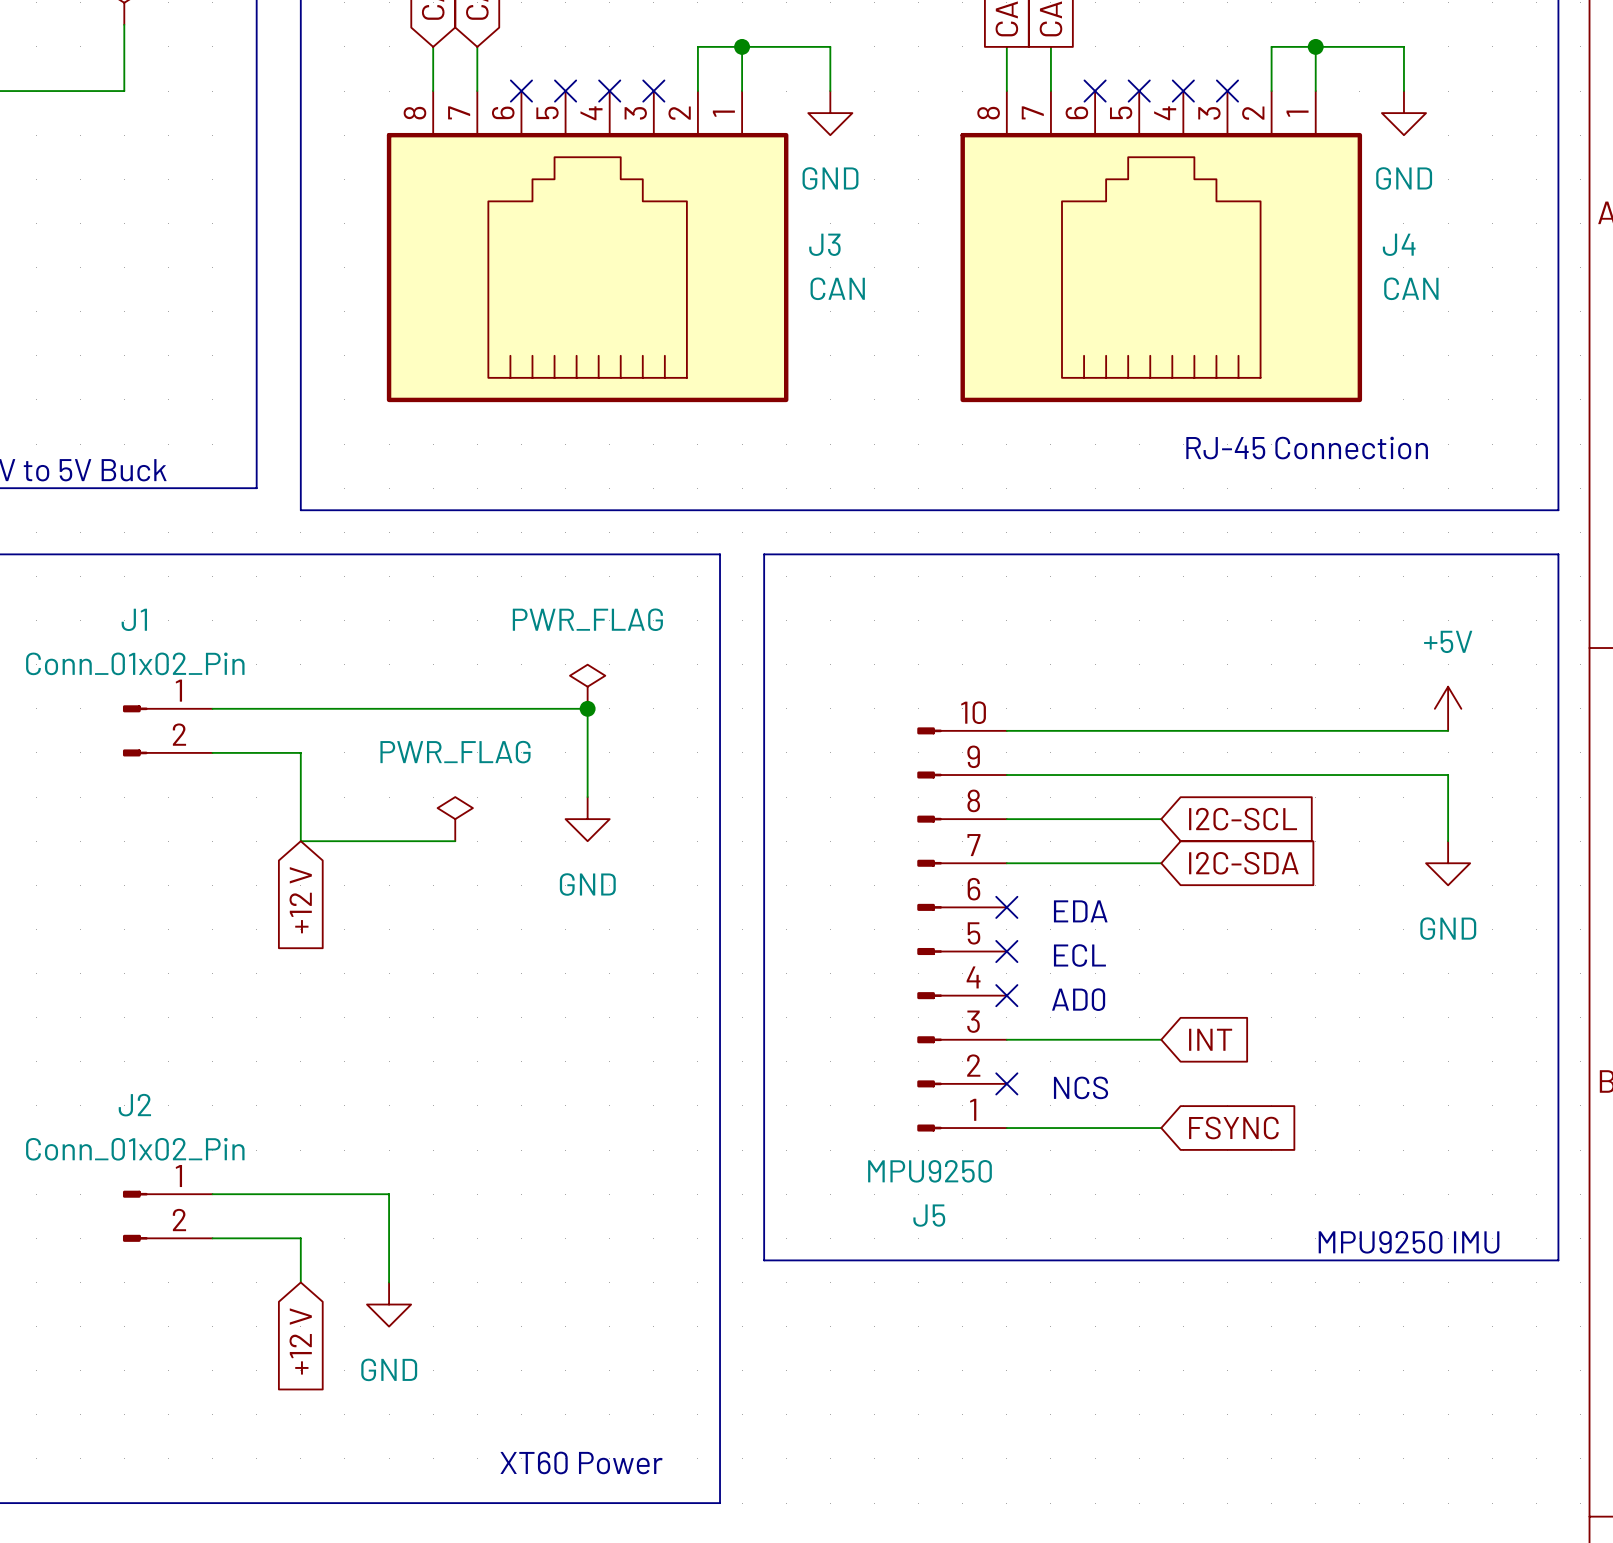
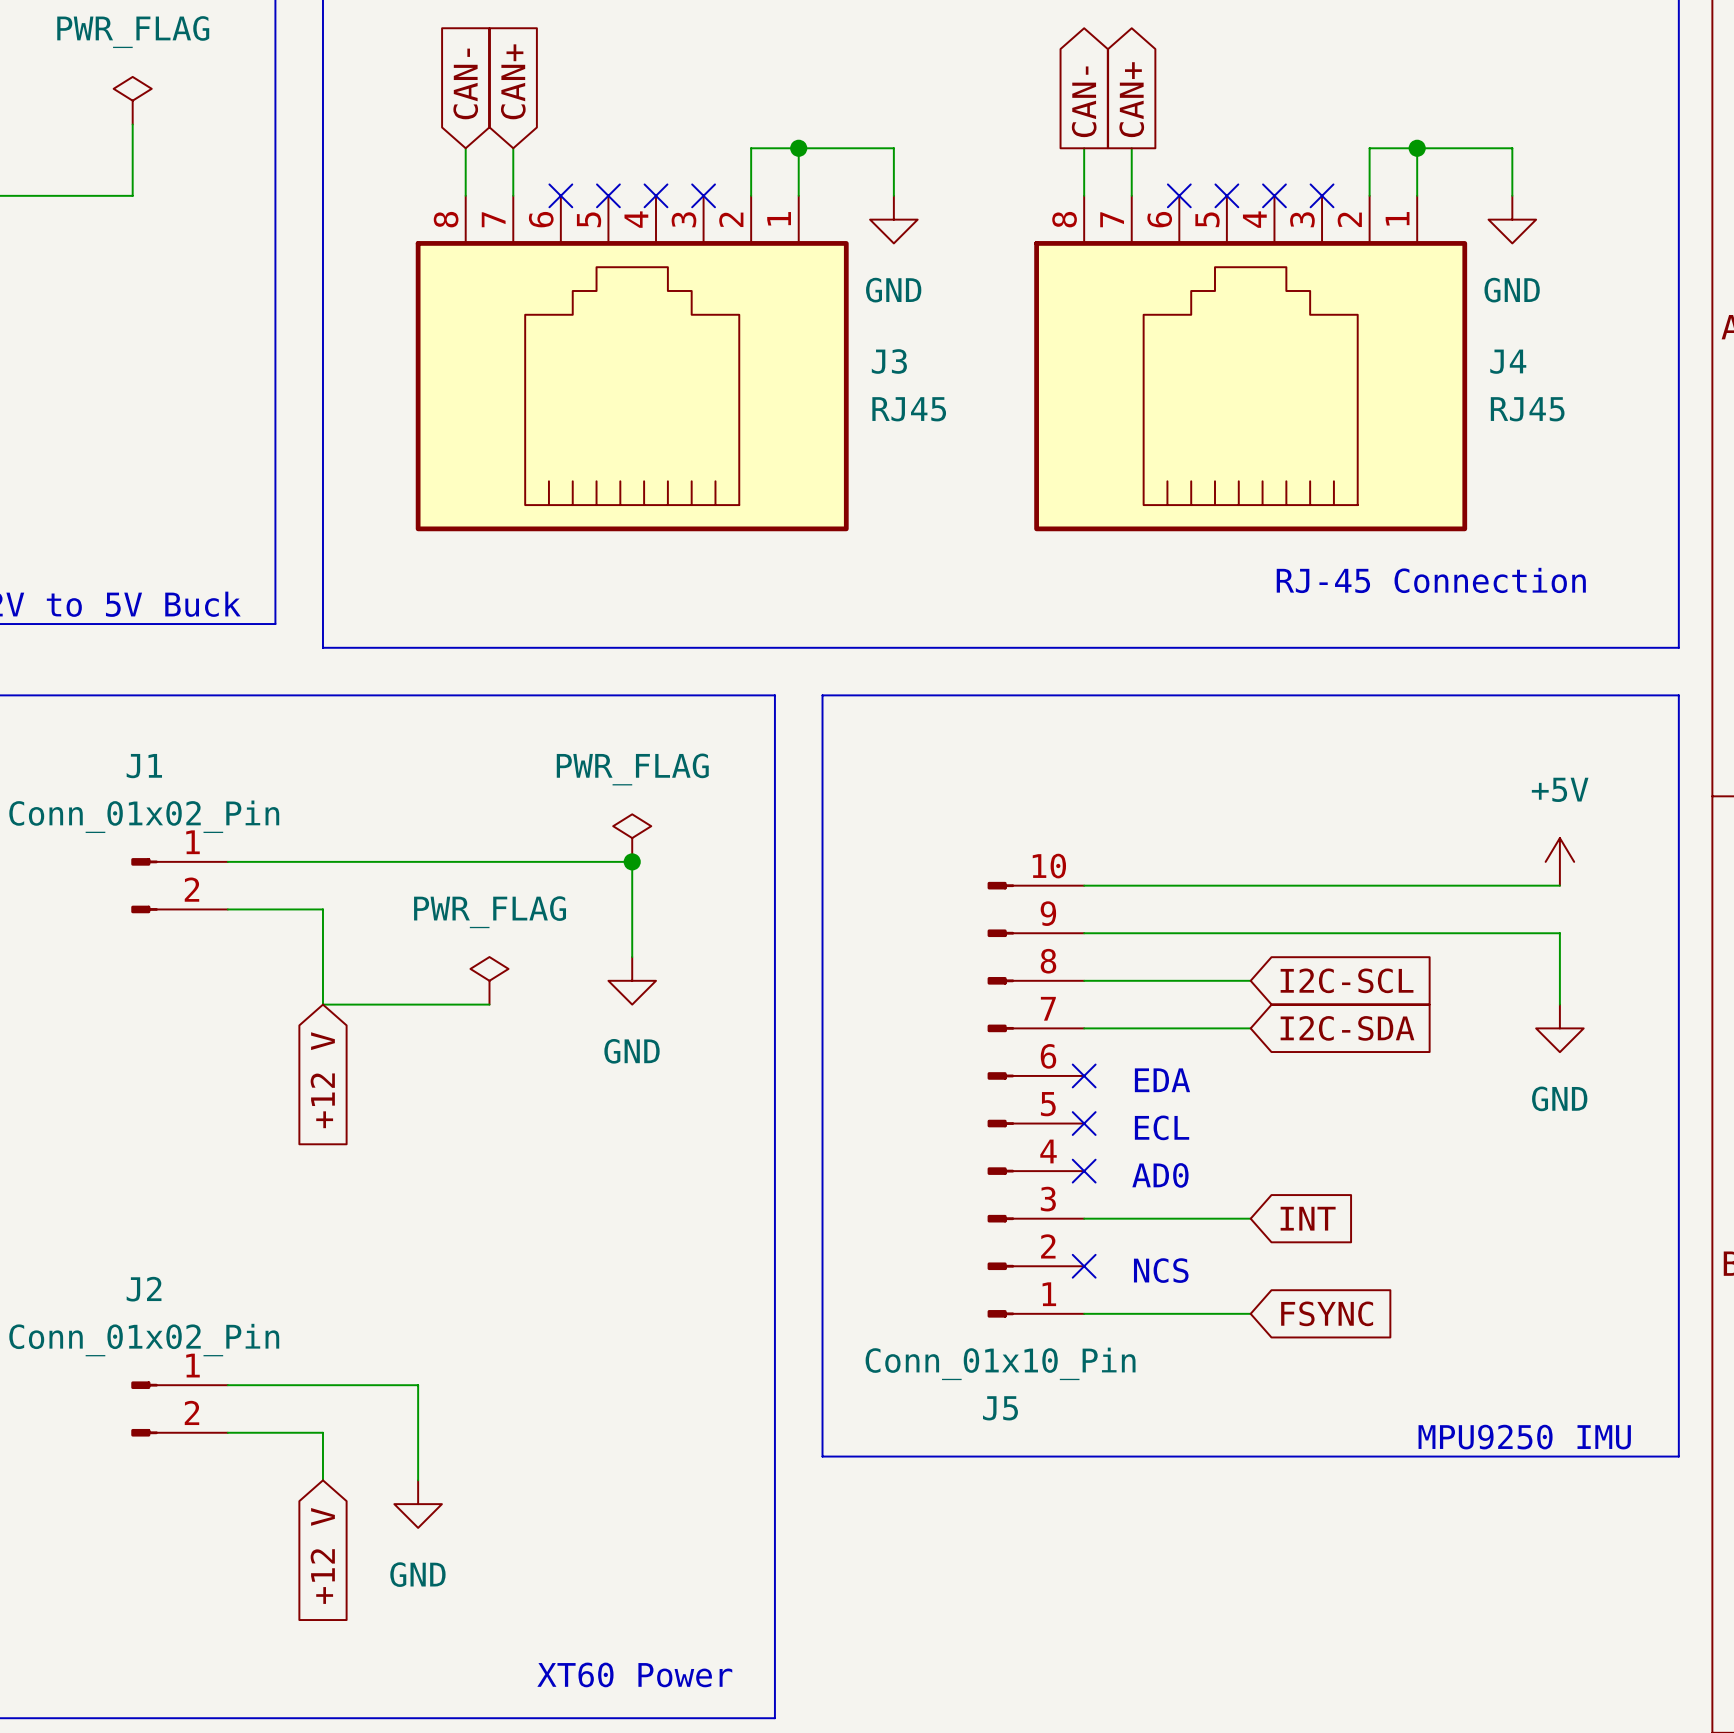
J3 value: CAN (837, 288) -> RJ45 (909, 409)
J4 value: CAN (1411, 288) -> RJ45 (1527, 409)
J5 value: MPU9250 (929, 1171) -> Conn_01x10_Pin (1000, 1363)

